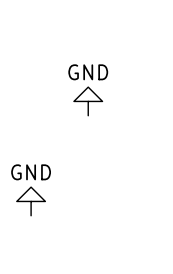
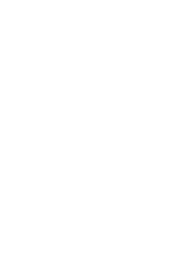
power symbol: GND (88, 101) -> none
power symbol: GND (31, 201) -> none

